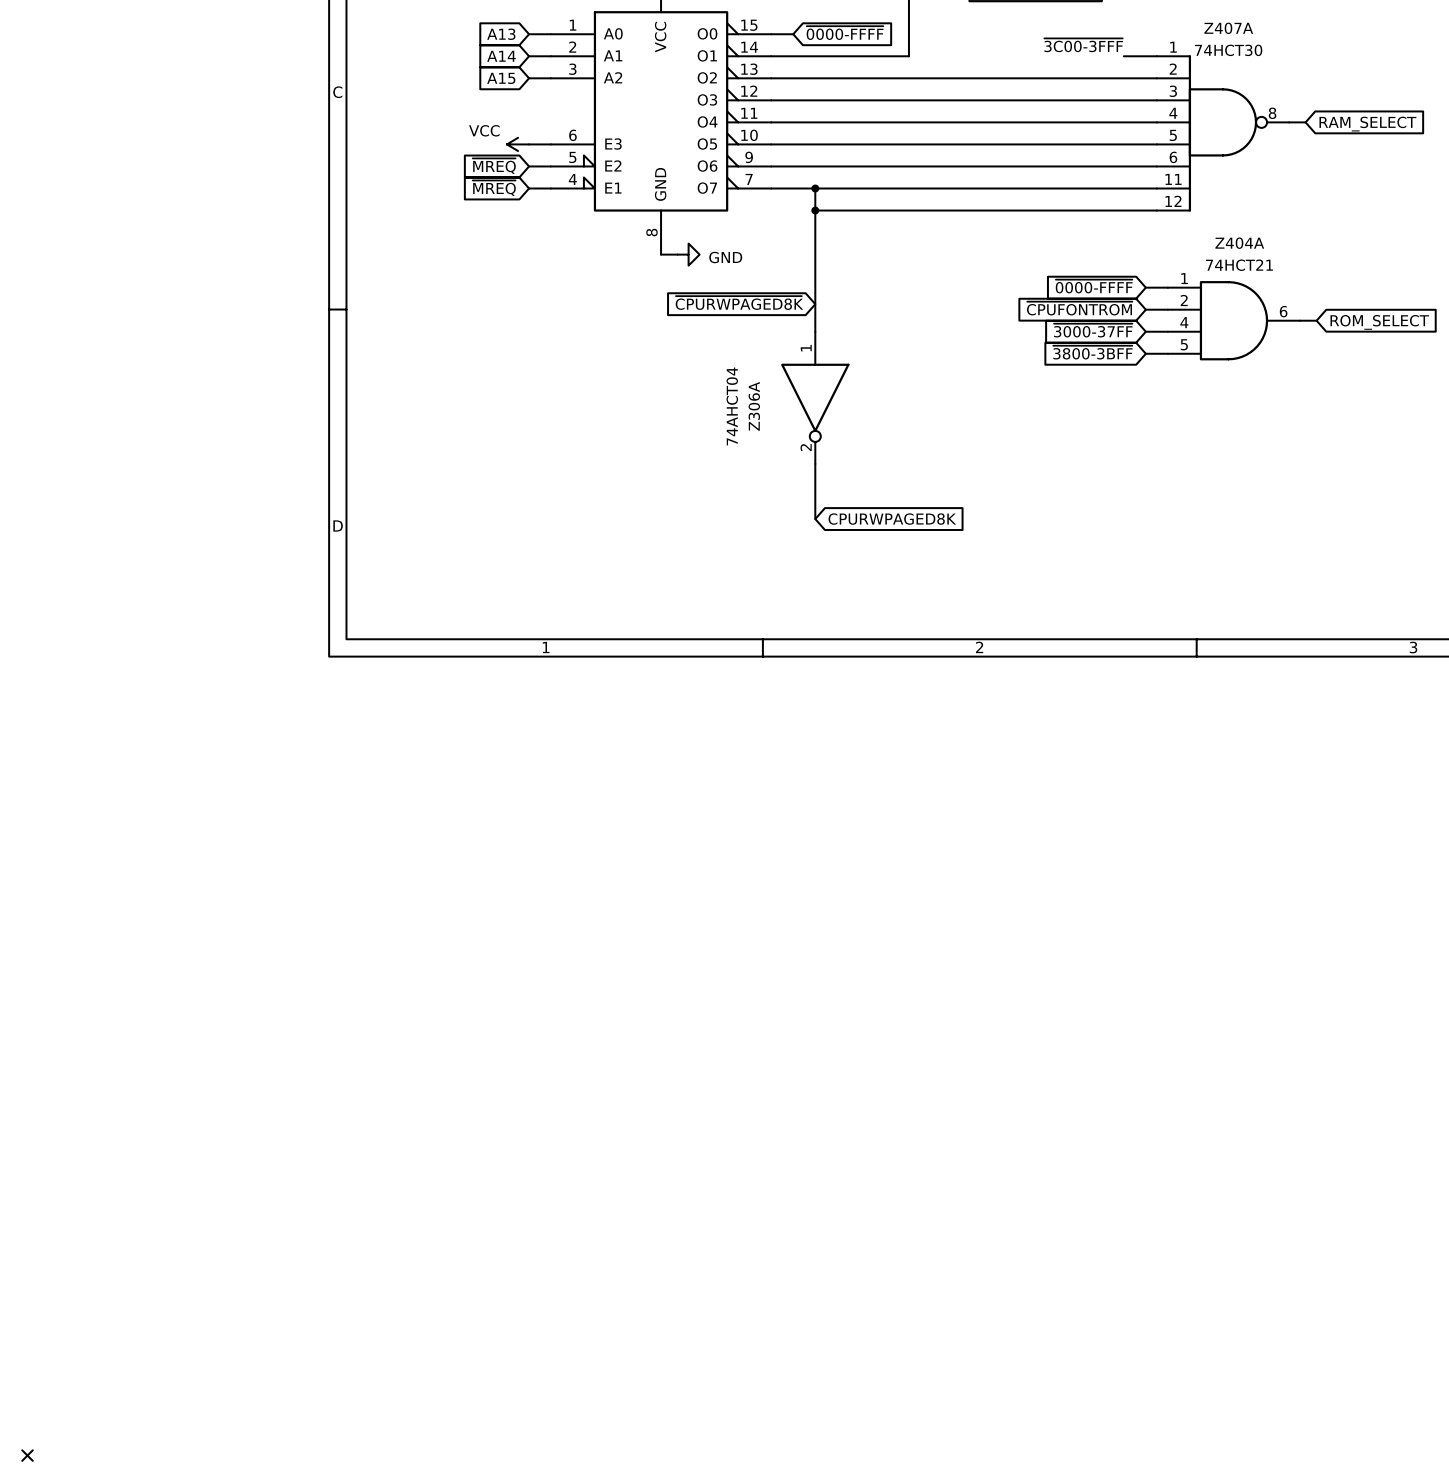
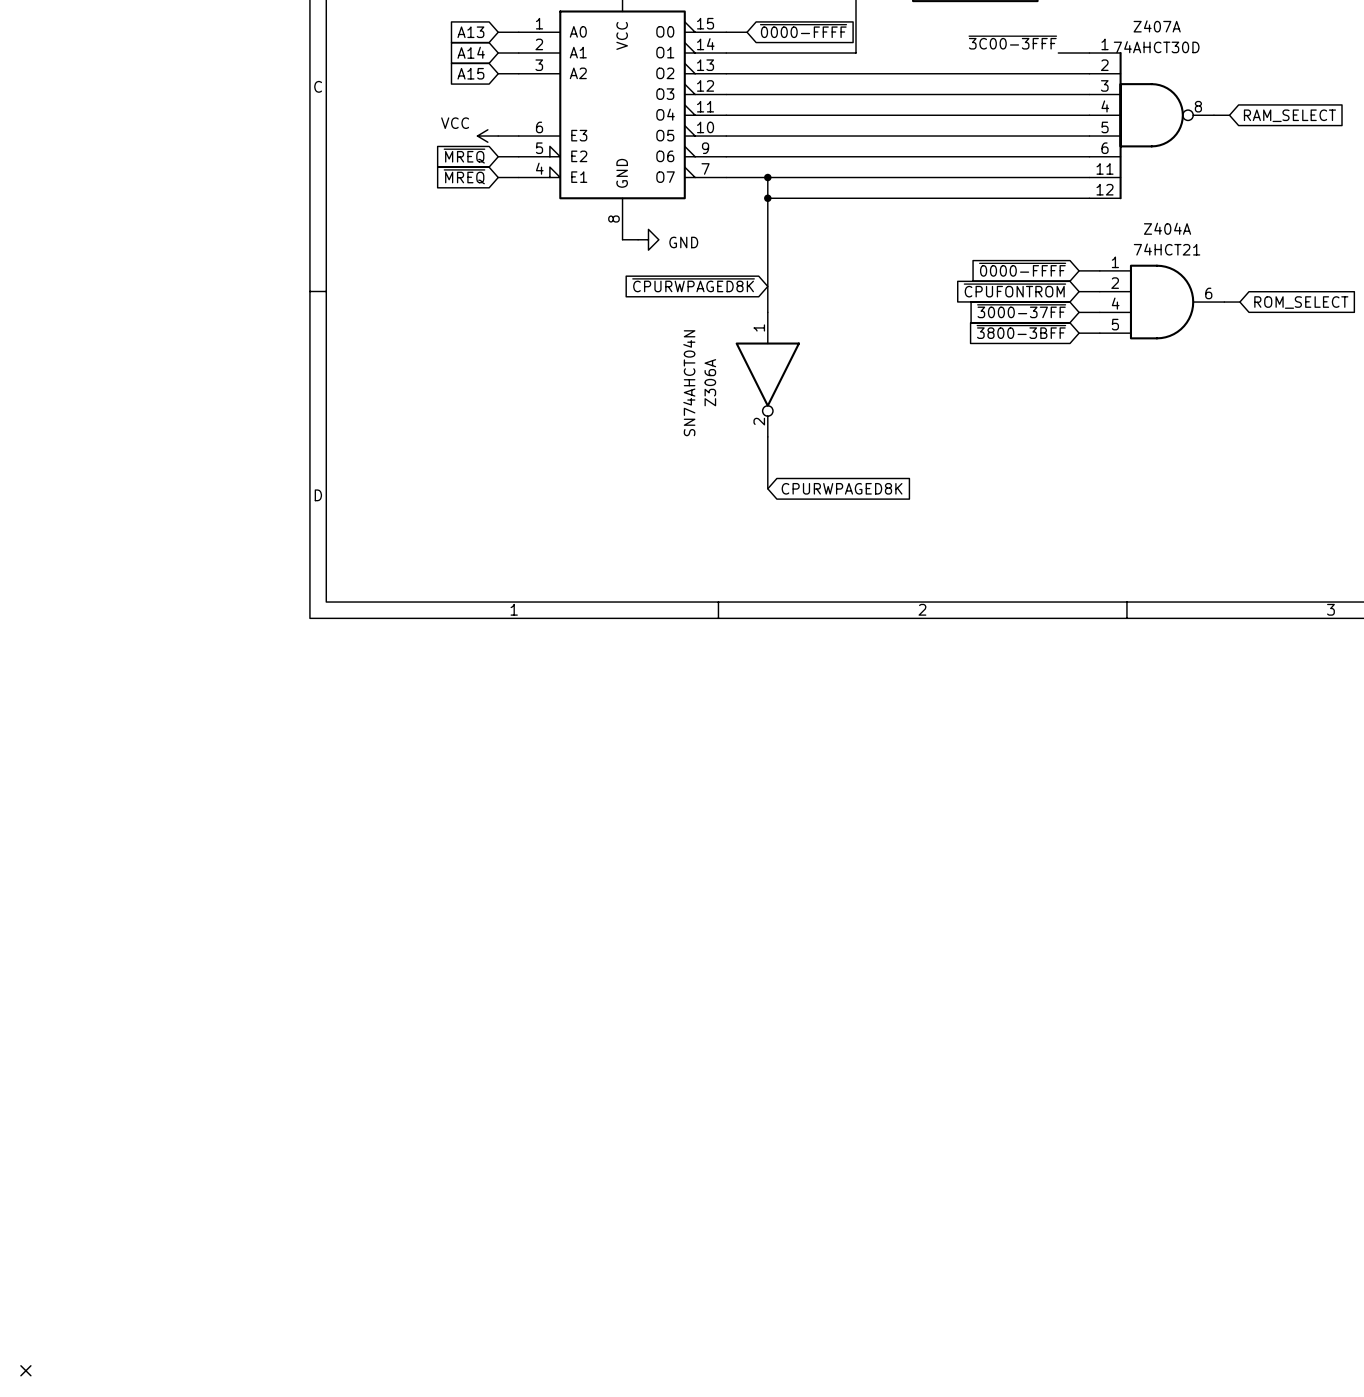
Z407A value: 74HCT30 (1228, 50) -> 74AHCT30D (1156, 47)
Z306A value: 74AHCT04 (732, 406) -> SN74AHCT04N (689, 383)

